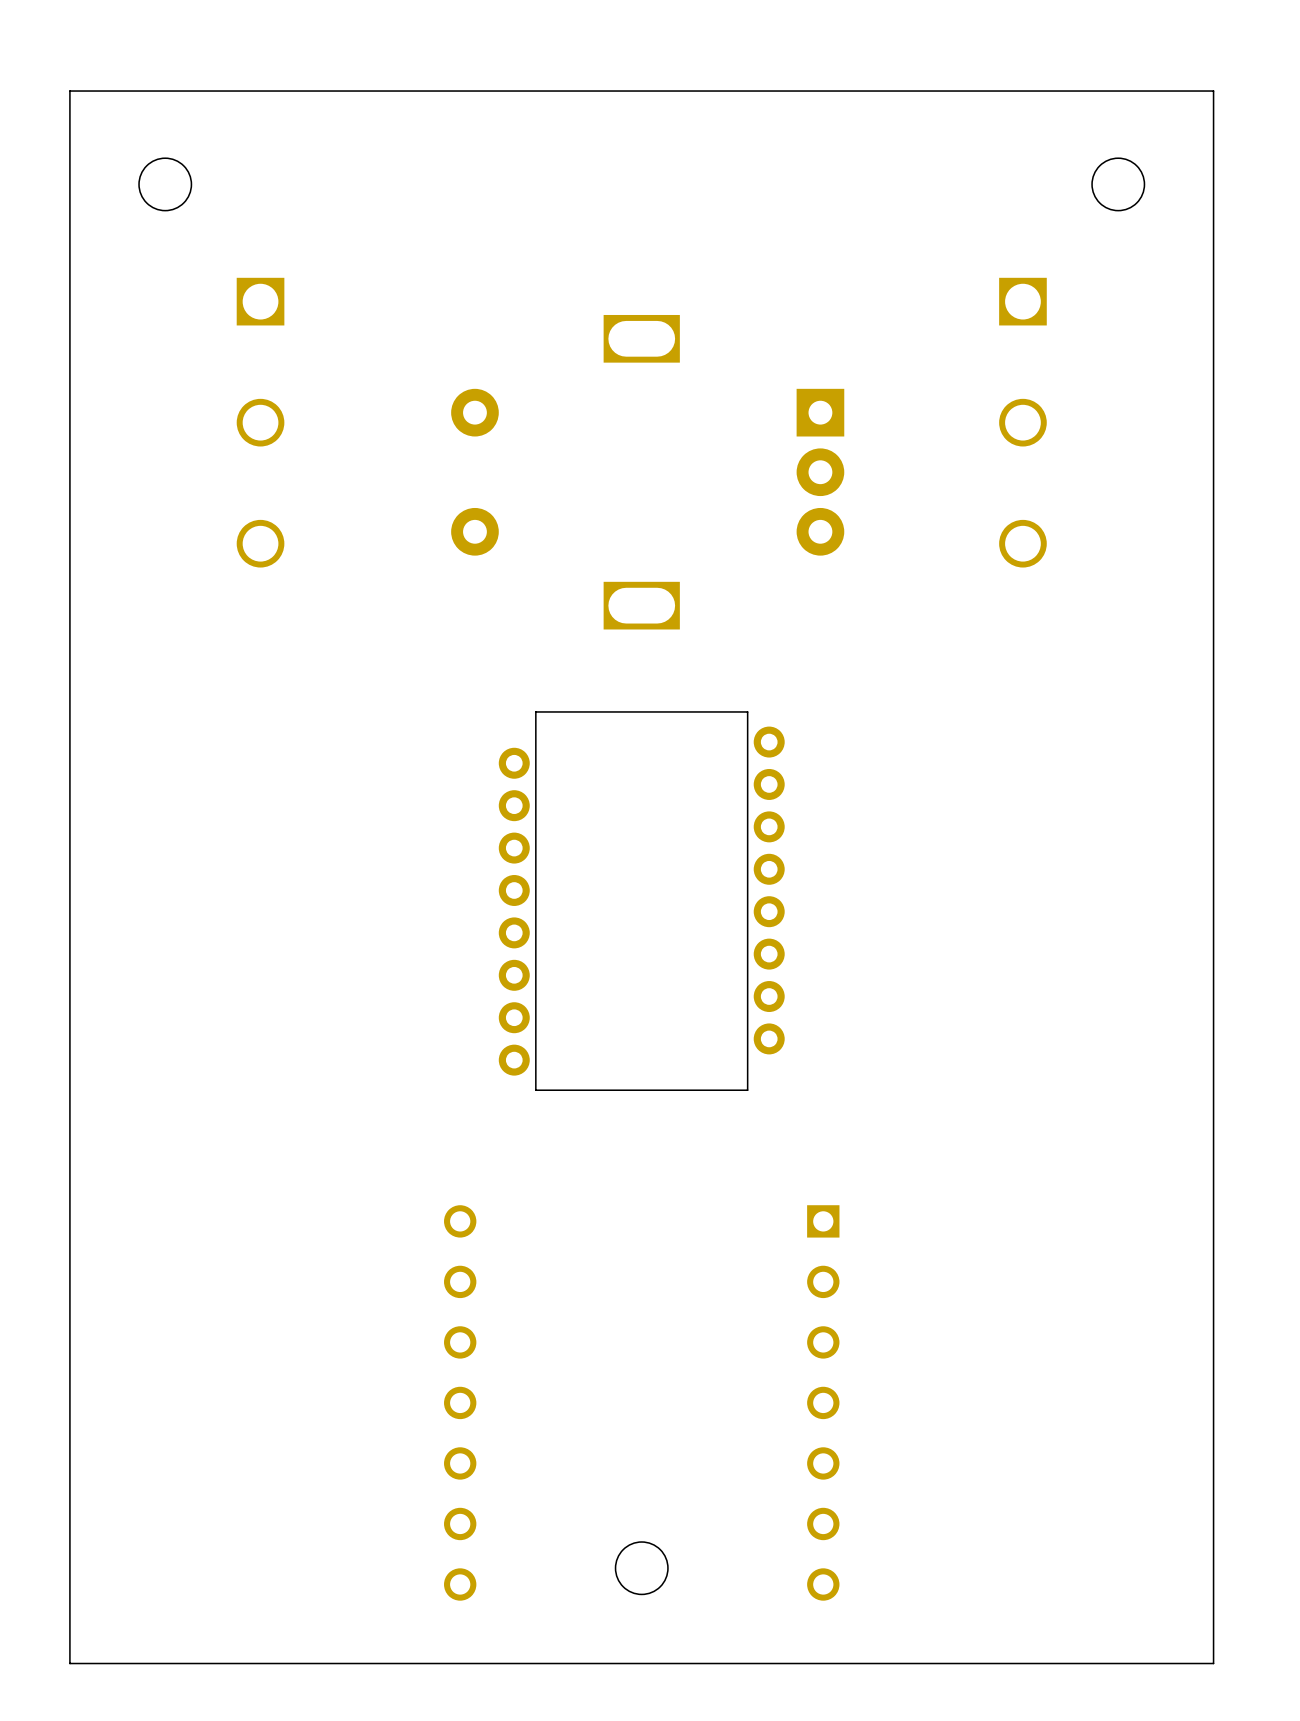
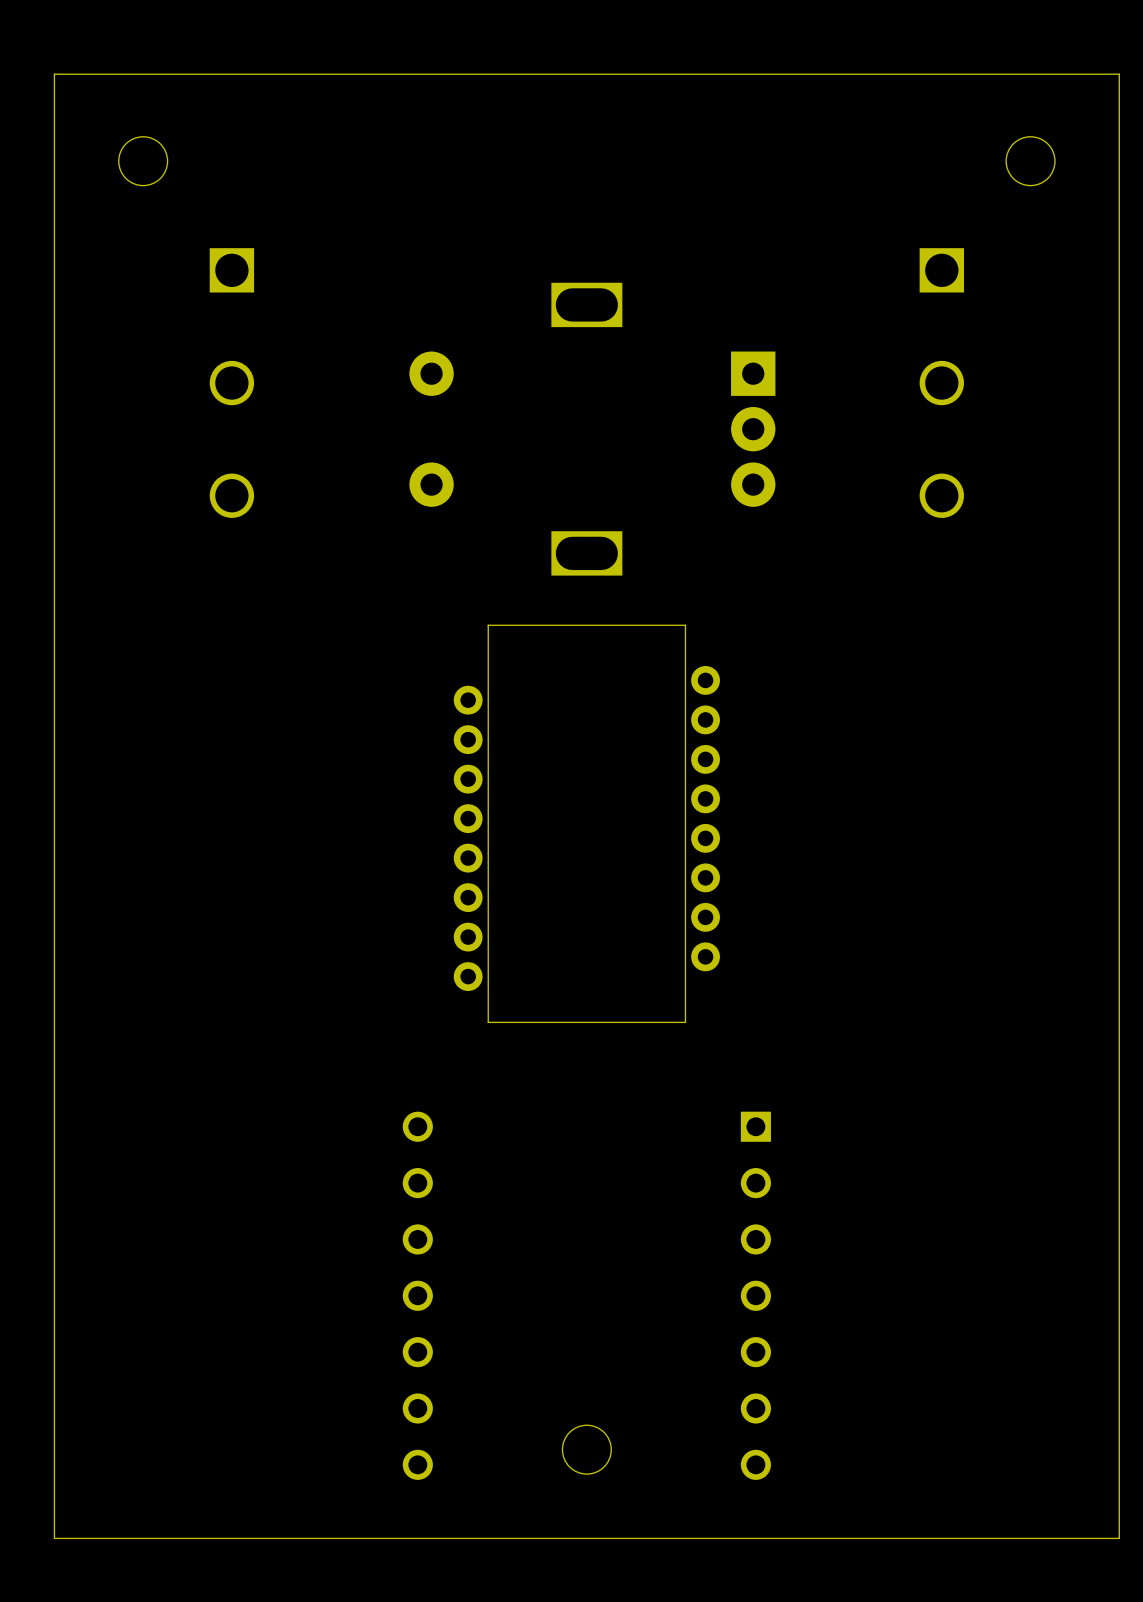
part footprint: [498, 711, 785, 1091] -> [453, 625, 720, 1023]

